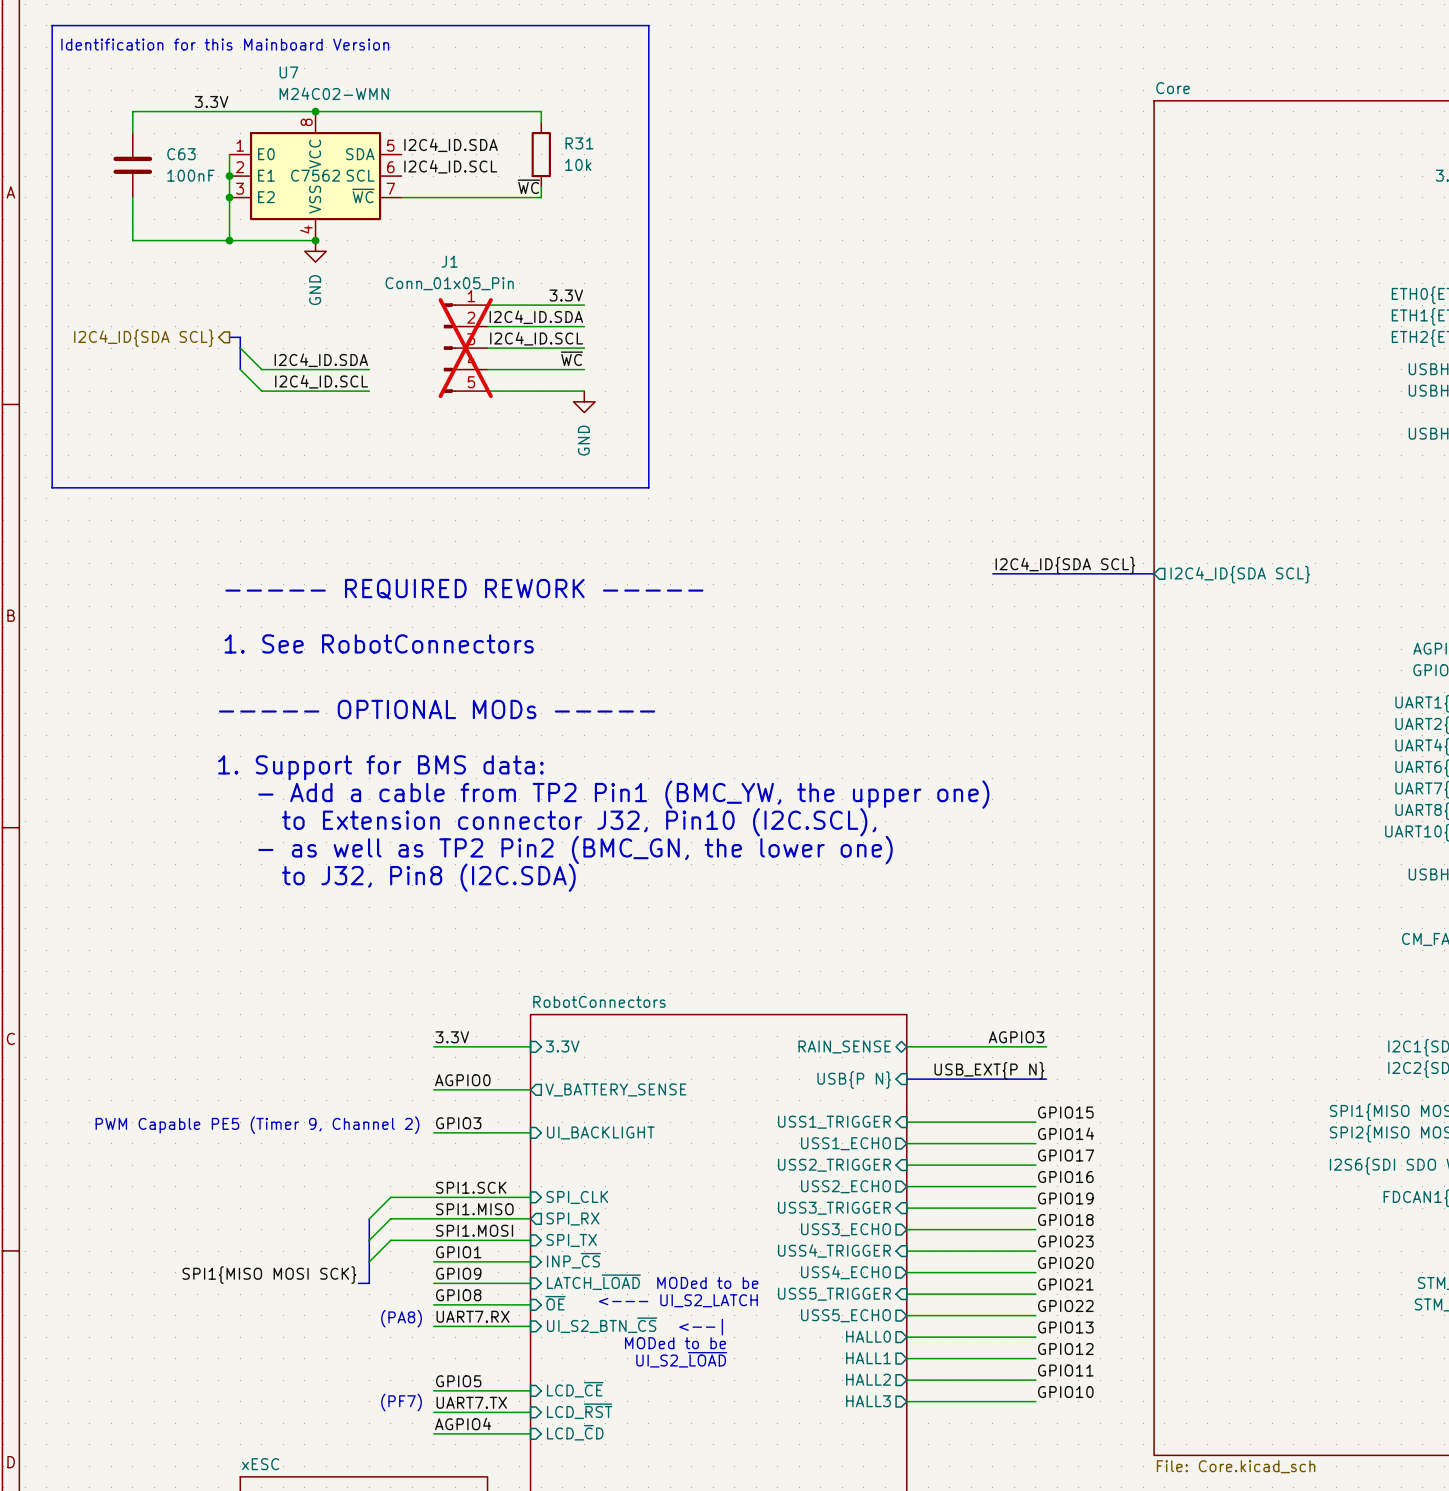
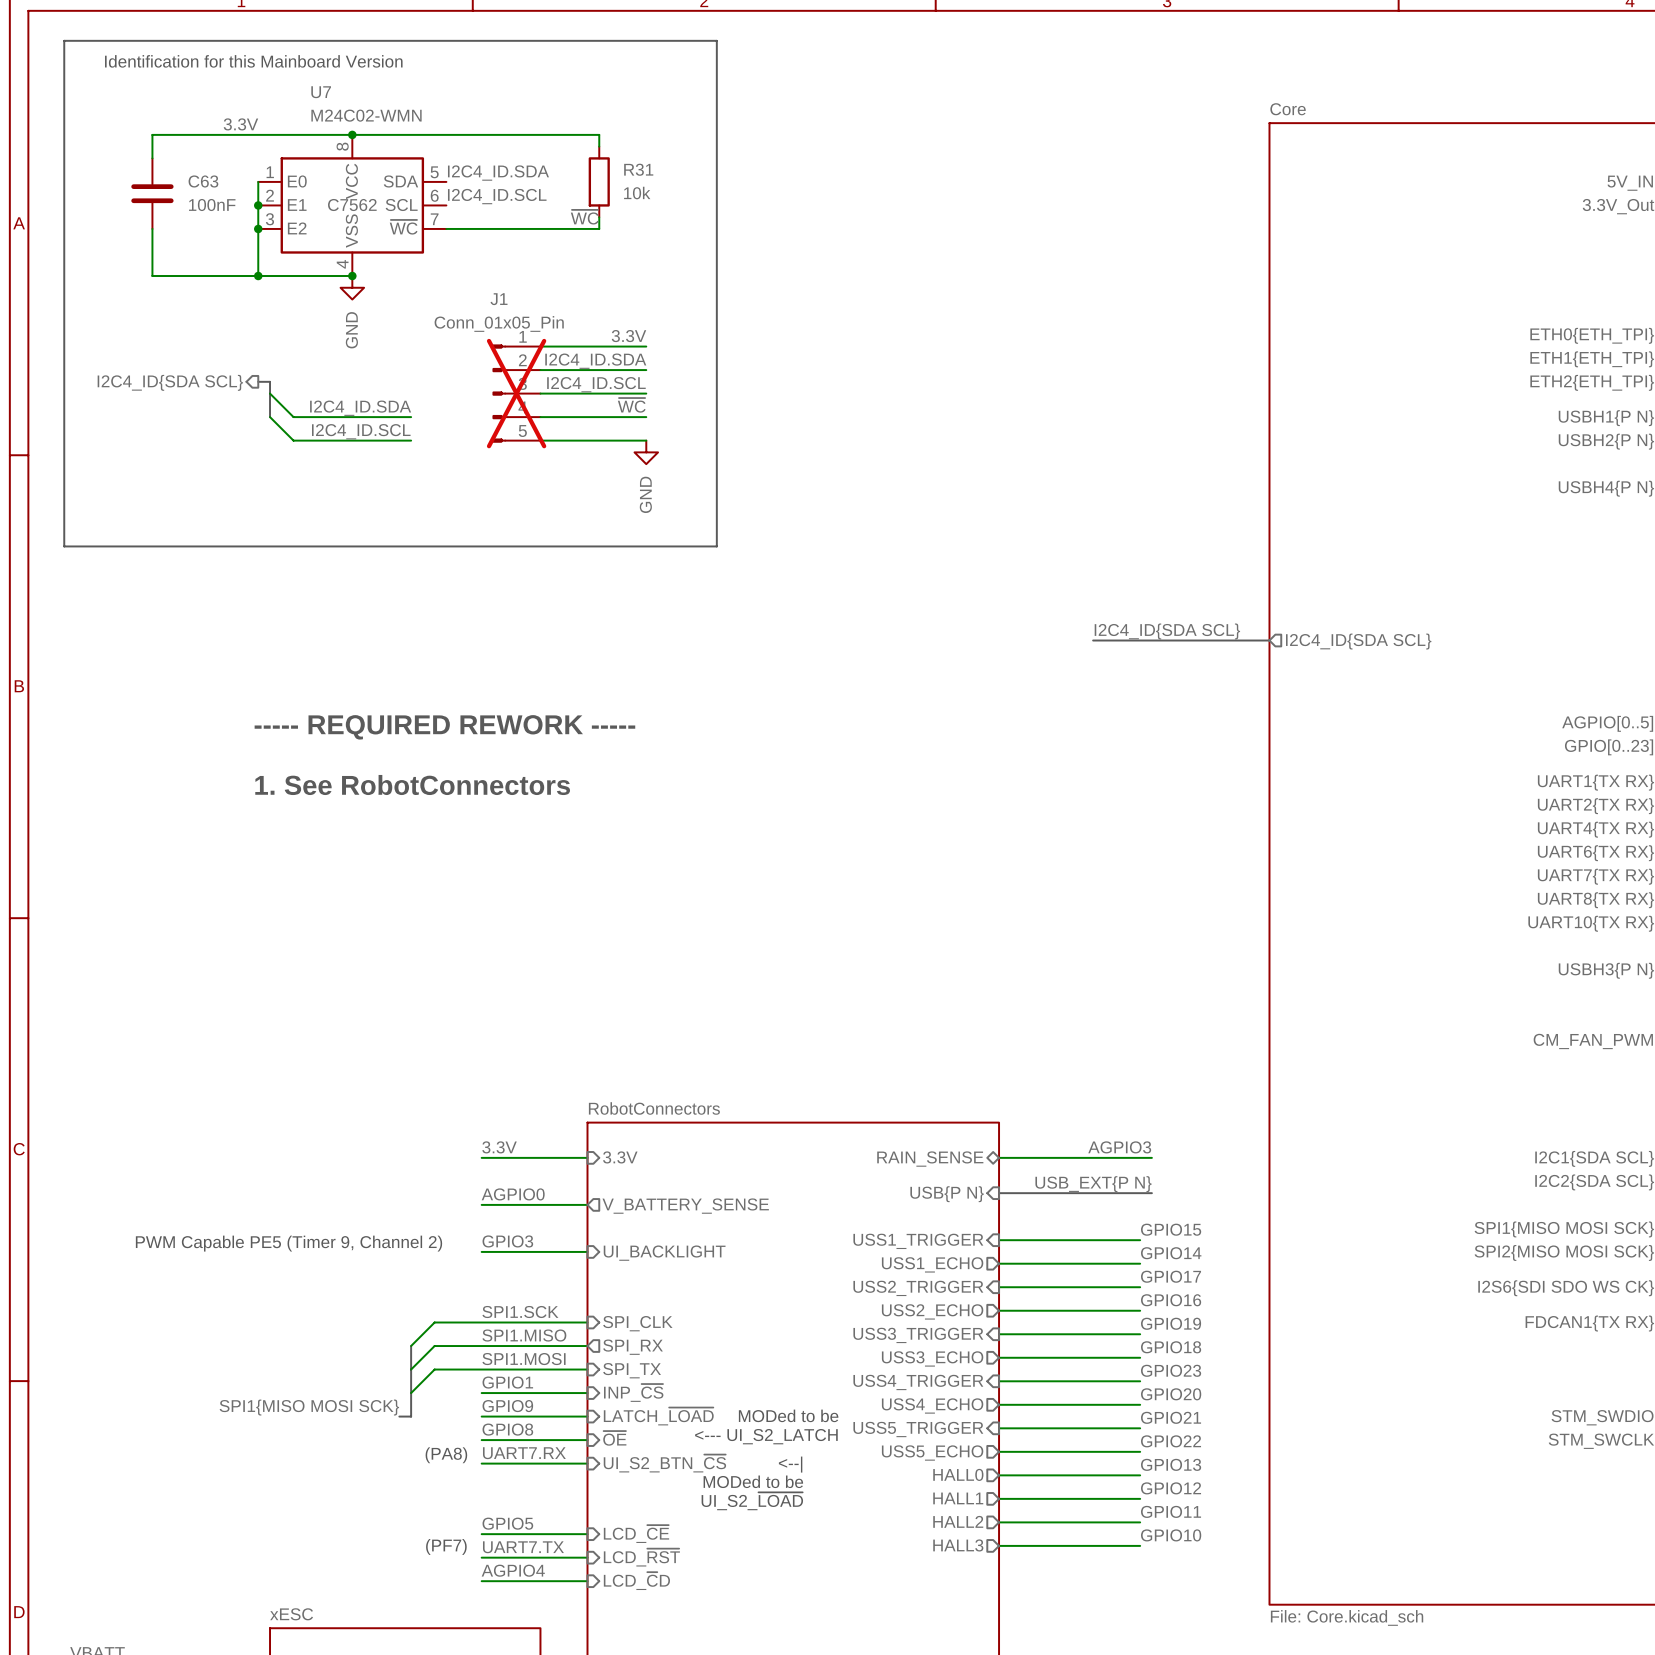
text: ----- REQUIRED REWORK ----- (464, 589) -> none
text: 1. See RobotConnectors (379, 643) -> ----- REQUIRED REWORK ----- (444, 727)
text: none -> 1. See RobotConnectors (412, 785)
text: ----- OPTIONAL MODs ----- (437, 709) -> none
text: 1. Support for BMS data: (380, 767) -> none
text: - Add a cable from TP2 Pin1 (BMC_YW, the upper one) (623, 794) -> none
text: to Extension connector J32, Pin10 (I2C.SCL), (579, 822) -> none
text: - as well as TP2 Pin2 (BMC_GN, the lower one) (575, 849) -> none
text: to J32, Pin8 (I2C.SDA) (428, 877) -> none

